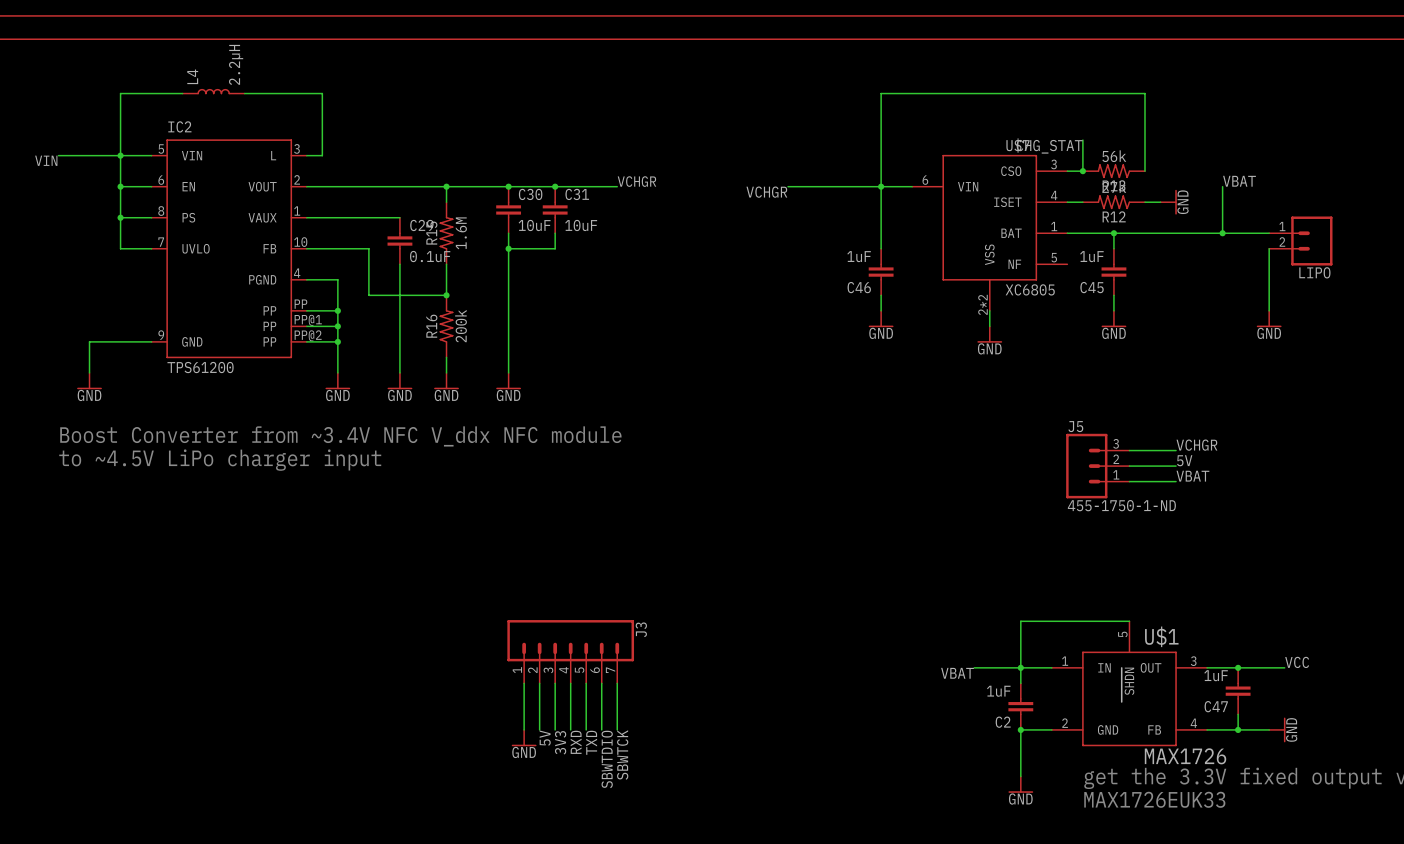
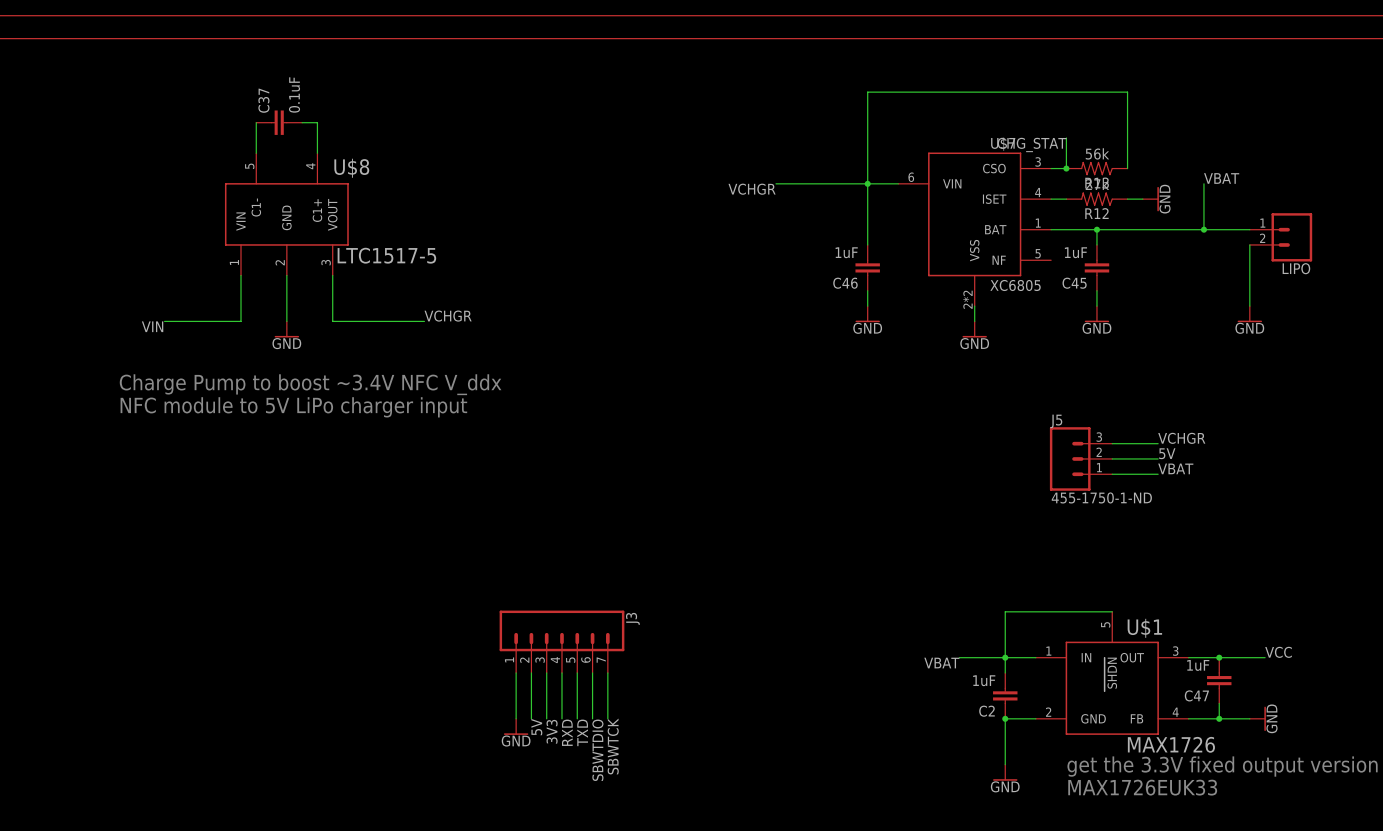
L4: 2.2µH (213, 91) -> none
wire: (182, 93) (120, 93) (120, 248) (151, 248) -> none
wire: (244, 93) (322, 93) (322, 124) -> (302, 122) (317, 122)
wire: none -> (256, 122) (256, 153)
C37: none -> 0.1uF (279, 122)
wire: (58, 155) (151, 155) -> none
junction: (120, 155) -> none
wire: (306, 155) (322, 155) -> none
label: VIN (46, 160) -> none
label: VCHGR (636, 181) -> none
wire: (120, 186) (151, 186) -> none
junction: (120, 186) -> none
wire: (306, 186) (617, 186) -> none
wire: (446, 186) (446, 202) -> none
junction: (446, 186) -> none
junction: (508, 186) -> none
junction: (555, 186) -> none
C30: 10uF (508, 209) -> none
C31: 10uF (555, 209) -> none
wire: (120, 217) (151, 217) -> none
junction: (120, 217) -> none
U$8: none -> LTC1517-5 (286, 214)
wire: (306, 217) (399, 217) -> (332, 321) (424, 321)
R15: 1.6M (446, 233) -> none
wire: (508, 233) (508, 372) -> none
wire: (555, 233) (555, 248) (508, 248) -> none
C29: 0.1uF (399, 241) -> none
IC2: TPS61200 (229, 248) -> none
wire: (306, 248) (368, 248) (368, 295) (446, 295) (446, 264) -> none
junction: (508, 248) -> none
wire: (399, 264) (399, 372) -> none
wire: none -> (241, 275) (241, 321) (164, 321)
wire: (306, 279) (337, 279) -> none
junction: (446, 295) -> none
wire: (306, 310) (337, 310) -> none
junction: (337, 310) -> none
label: none -> VCHGR (448, 316)
wire: (306, 326) (337, 326) (337, 372) -> none
junction: (337, 326) -> none
R16: 200k (446, 326) -> none
label: none -> VIN (152, 326)
power symbol: none -> GND (286, 329)
wire: (151, 341) (89, 341) (89, 372) -> none
wire: (306, 341) (337, 341) -> none
junction: (337, 341) -> none
wire: (446, 357) (446, 372) -> none
power symbol: GND (89, 381) -> none
power symbol: GND (337, 381) -> none
power symbol: GND (399, 381) -> none
power symbol: GND (446, 381) -> none
power symbol: GND (508, 381) -> none
text: none -> Charge Pump to boost ~3.4V NFC V_ddx (310, 384)
text: none -> NFC module to 5V LiPo charger input (293, 407)
text: Boost Converter from ~3.4V NFC V_ddx NFC module (340, 436) -> none
text: to ~4.5V LiPo charger input (220, 460) -> none

